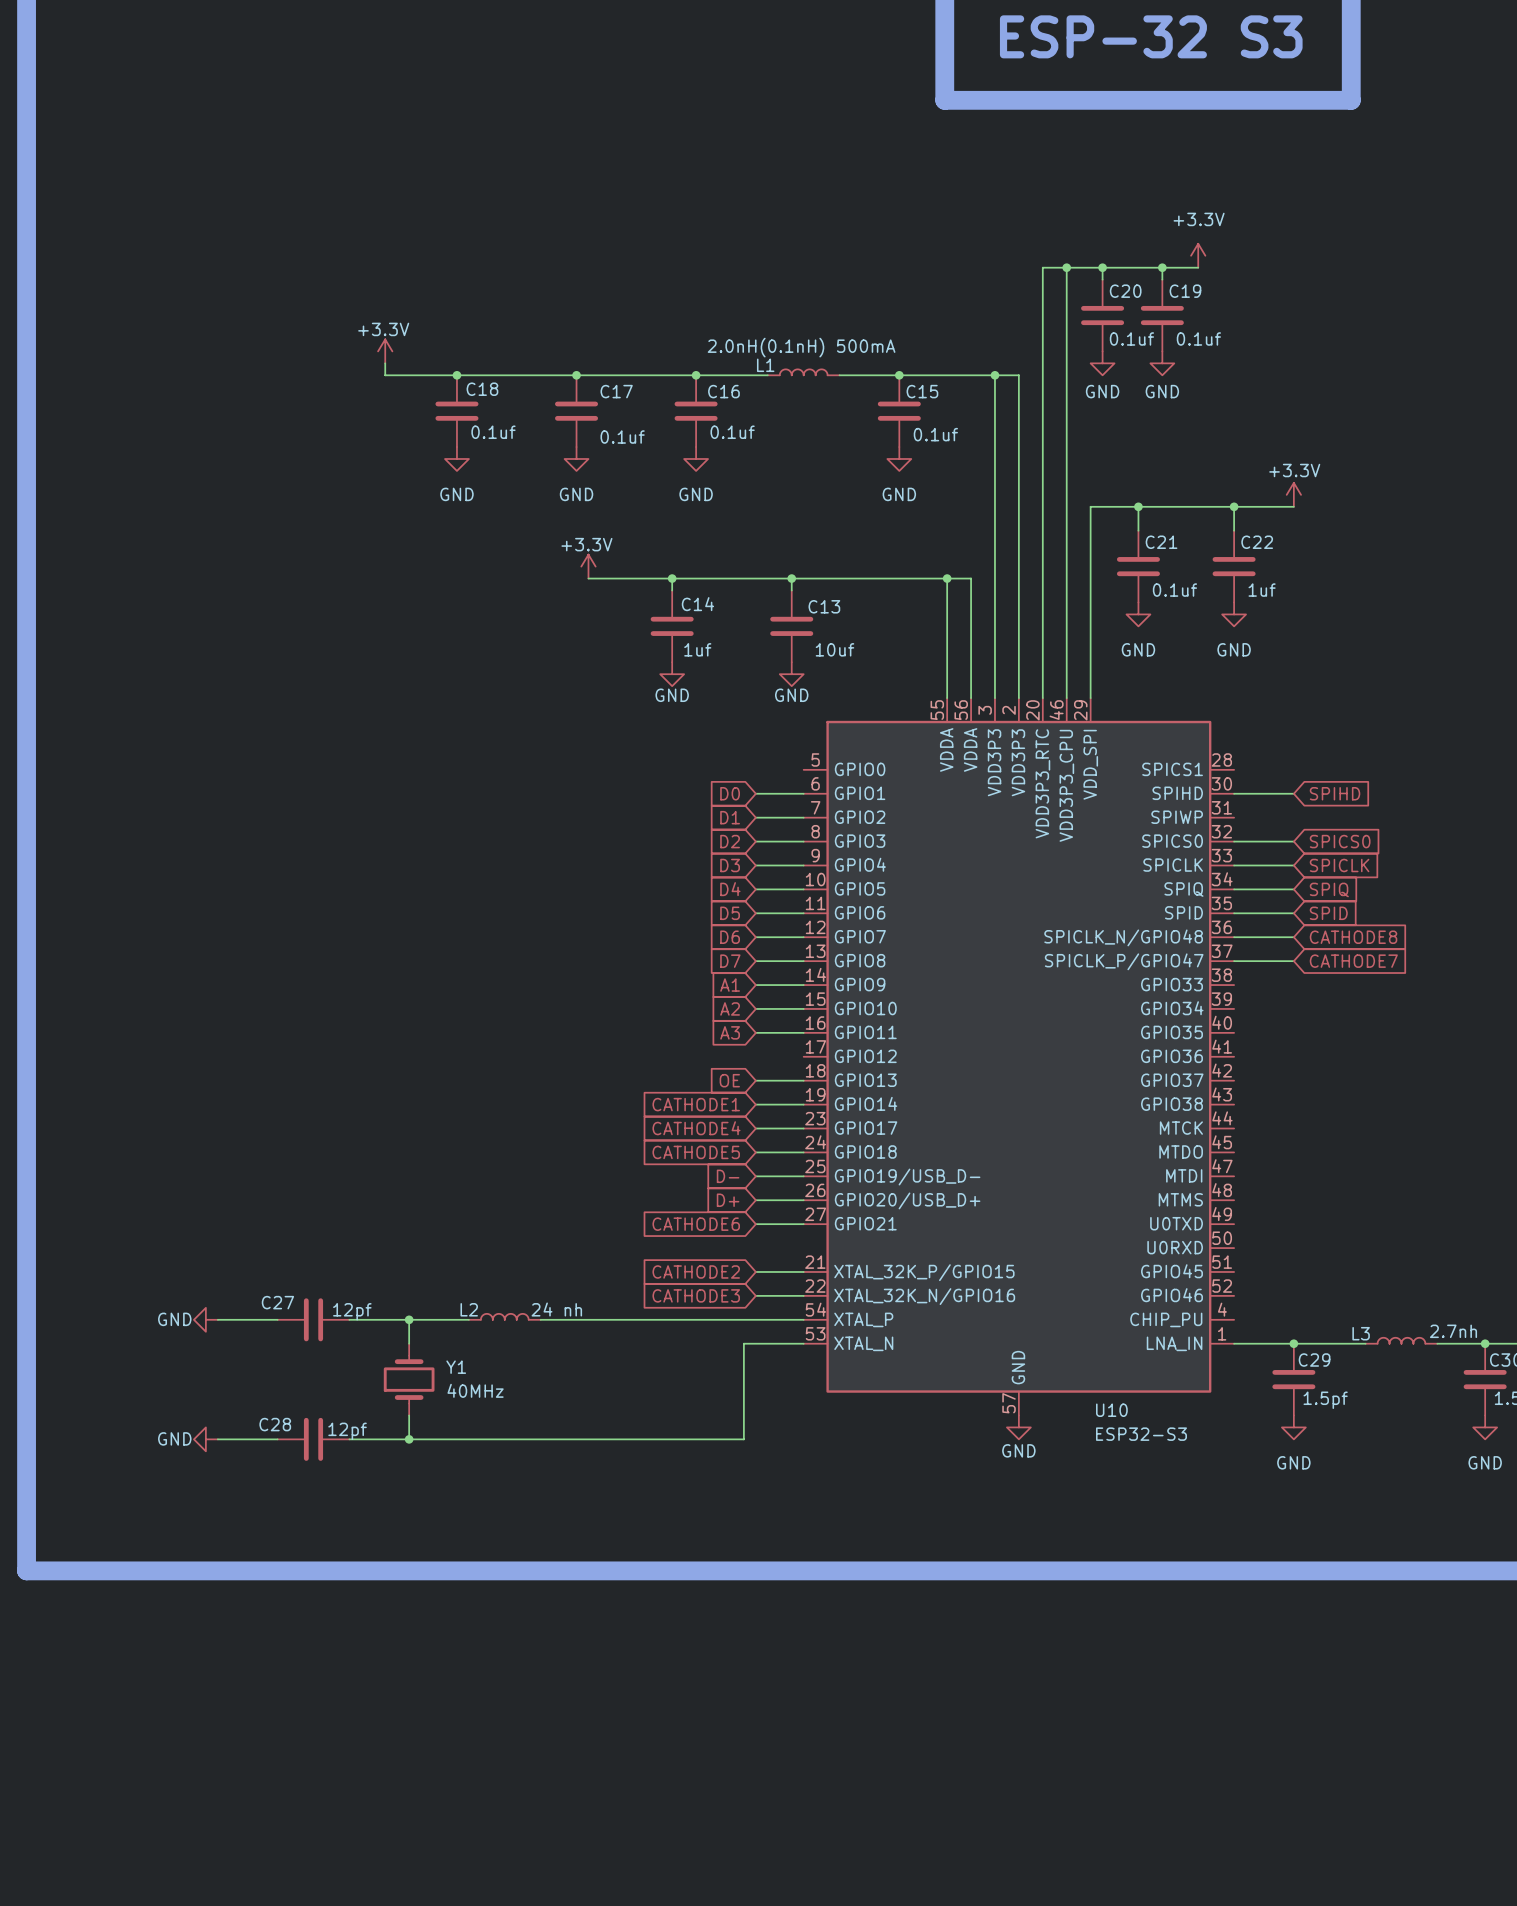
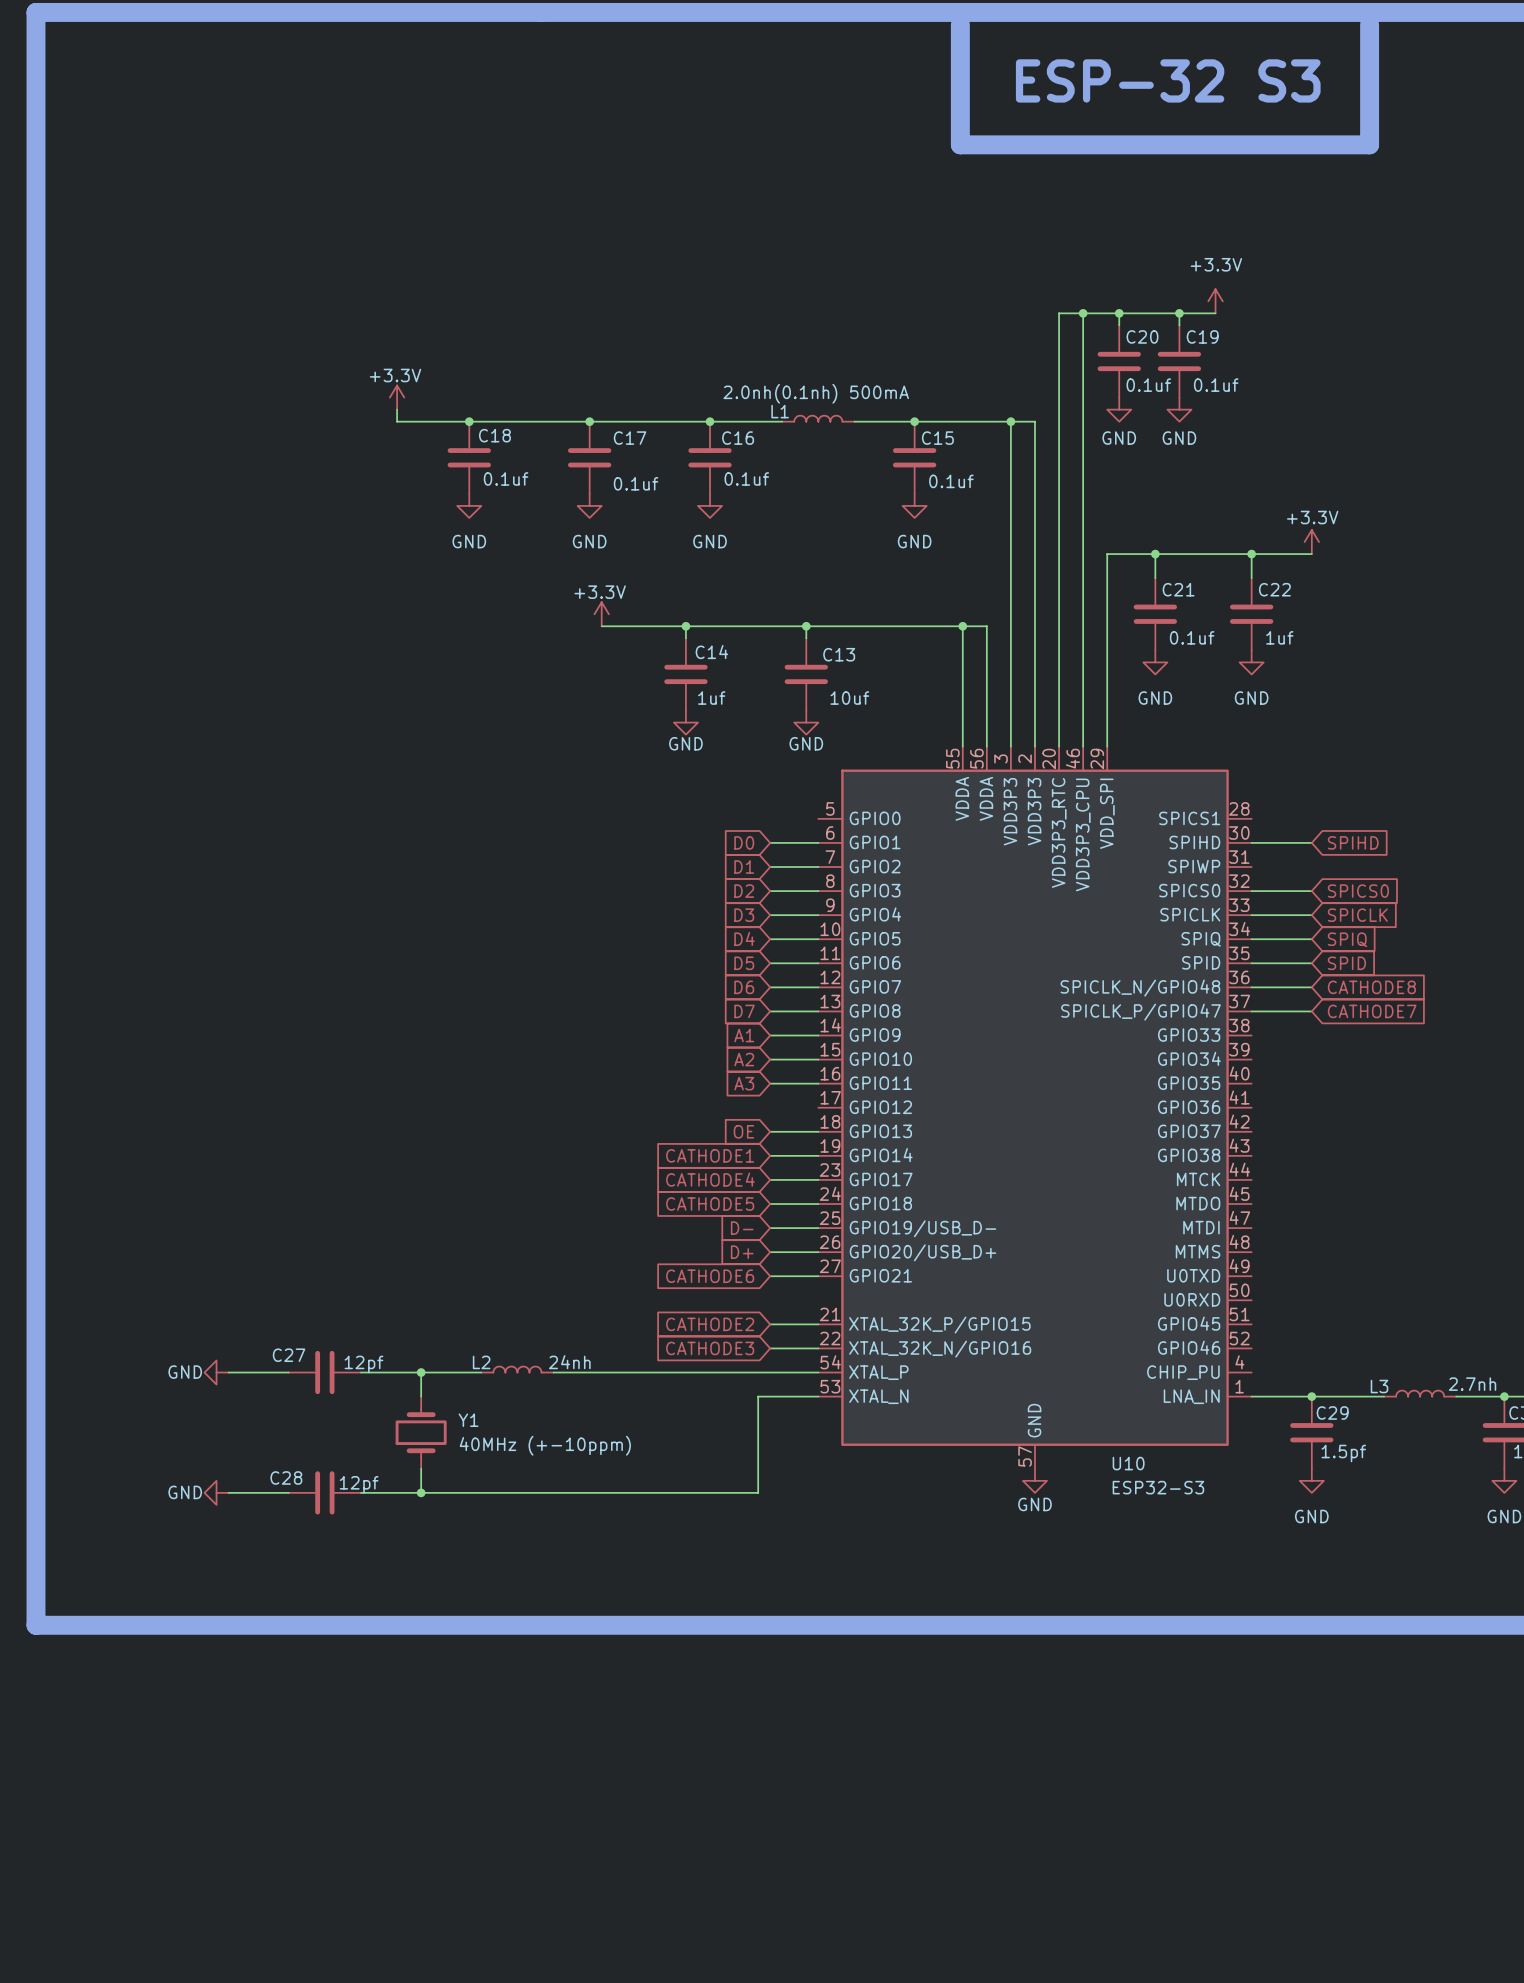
L1 value: 2.0nH(0.1nH) 500mA (801, 347) -> 2.0nh(0.1nh) 500mA (816, 393)
L2 value: 24 nh (556, 1309) -> 24nh (569, 1362)
Y1 value: 40MHz (475, 1390) -> 40MHz (+-10ppm) (545, 1445)

